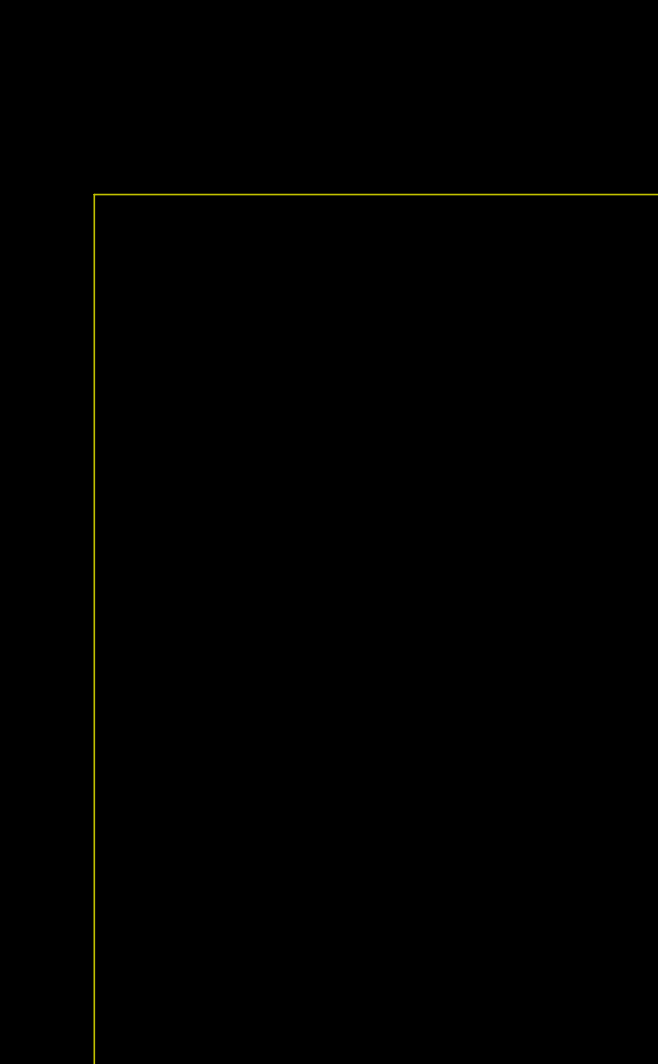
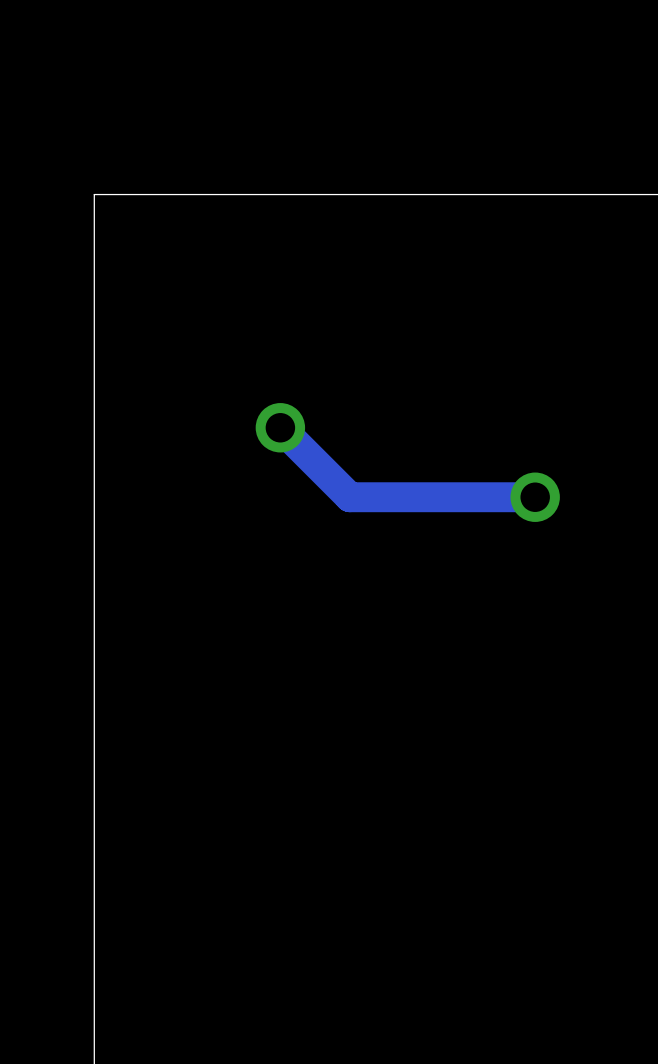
track: none -> (280, 427) (349, 497) (535, 497)
via: none -> (280, 427)
via: none -> (535, 497)

